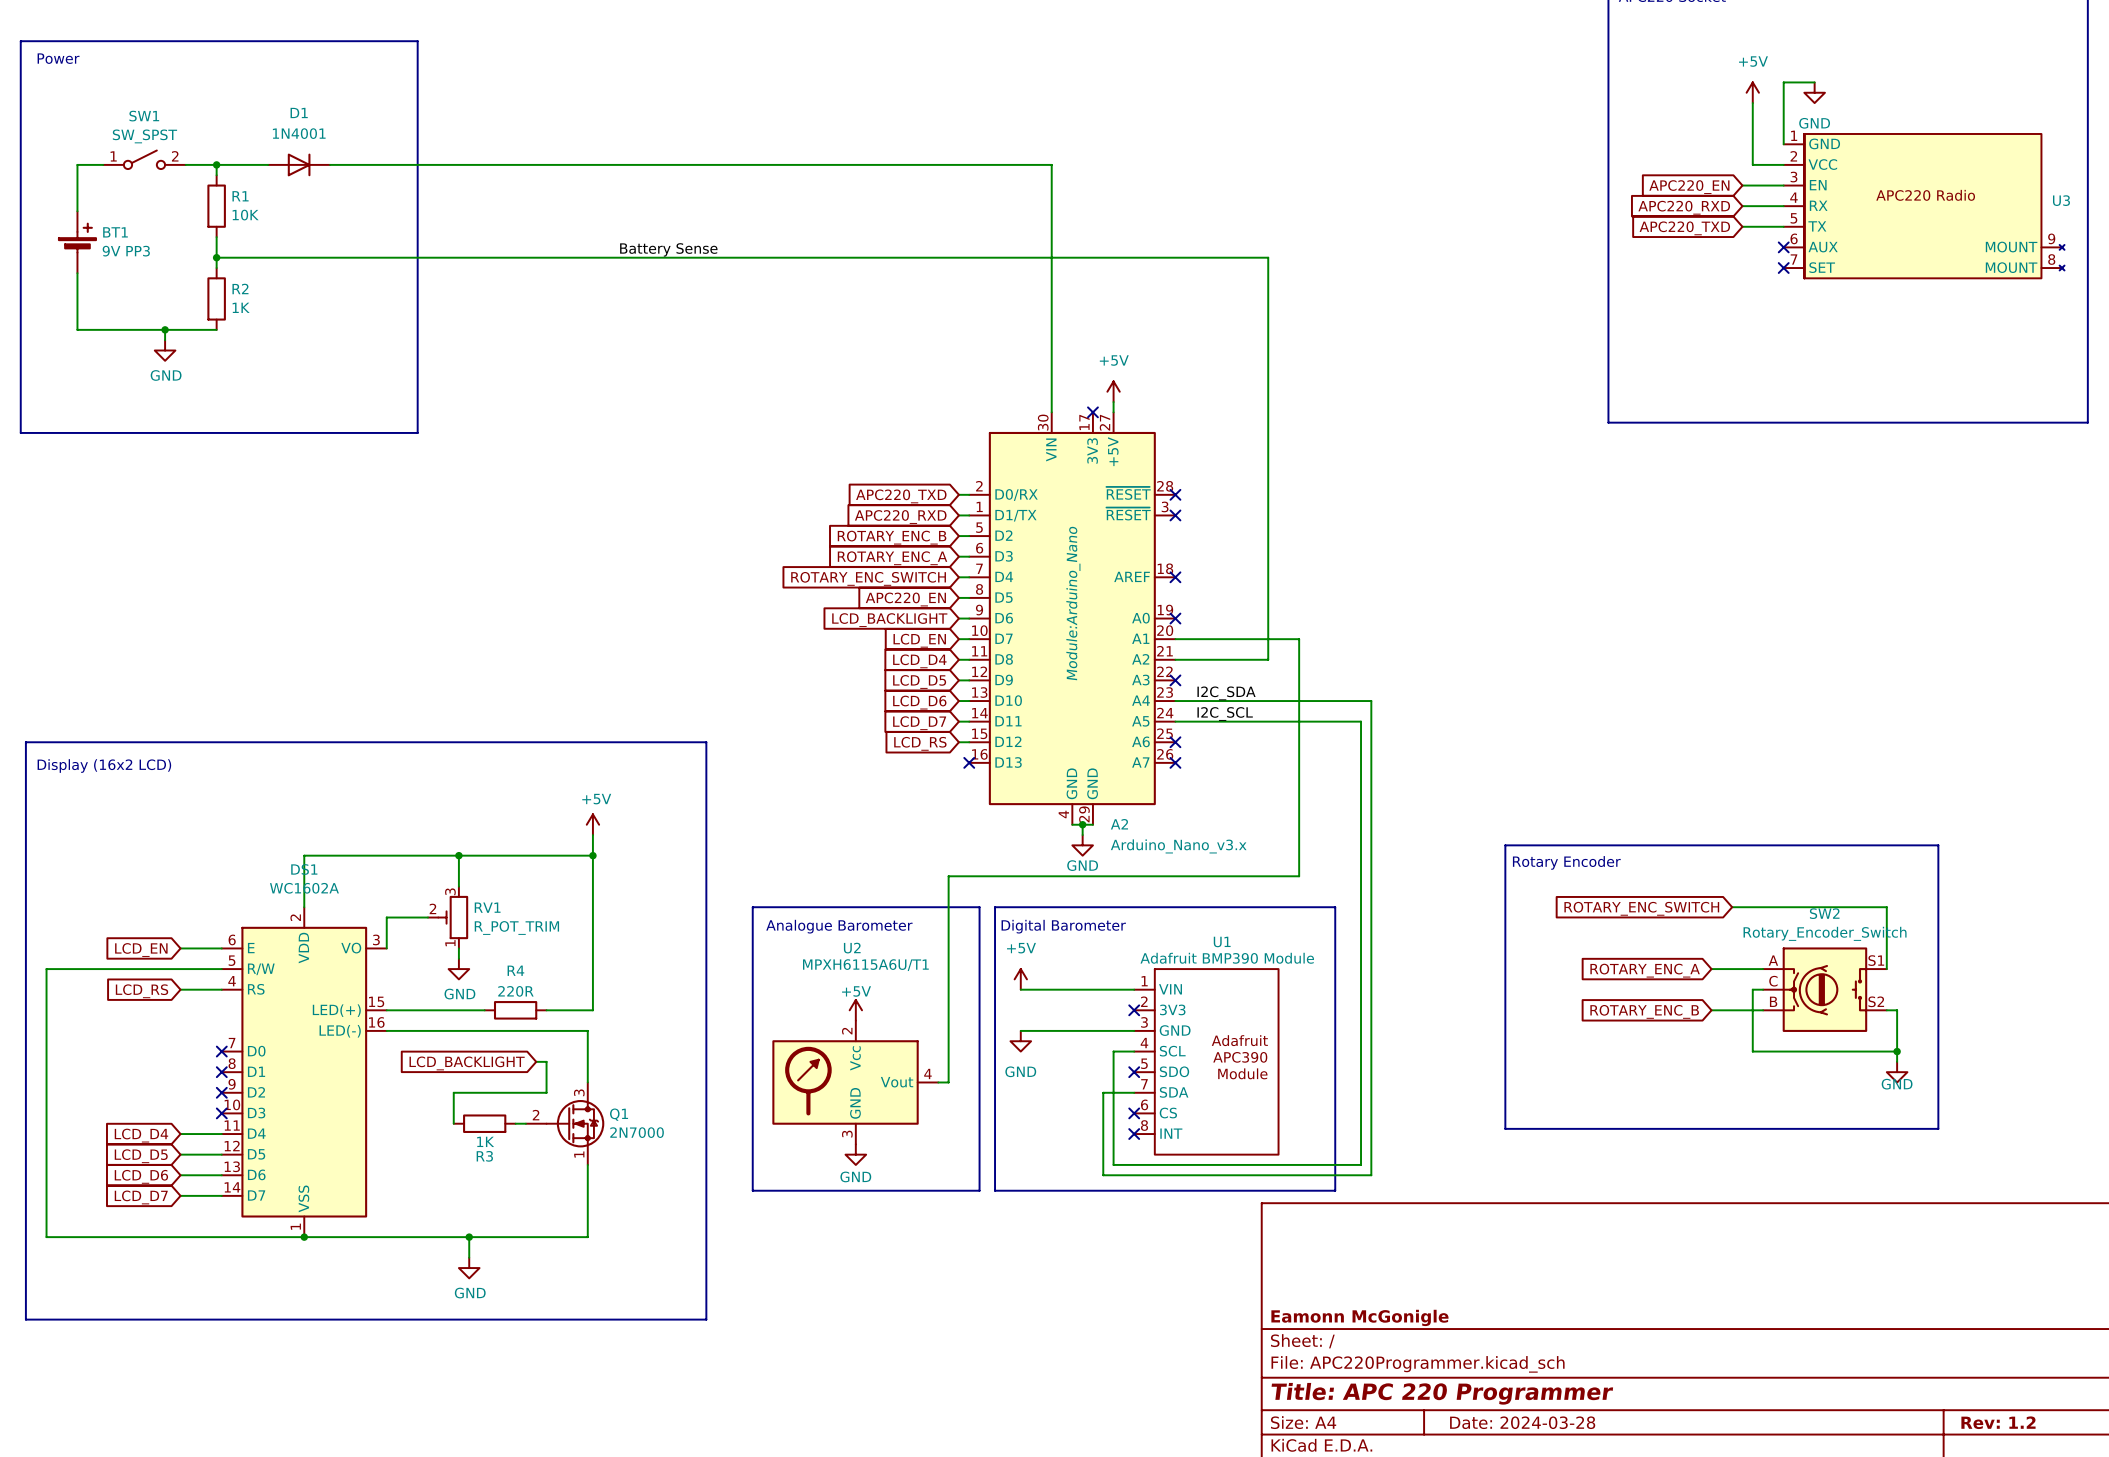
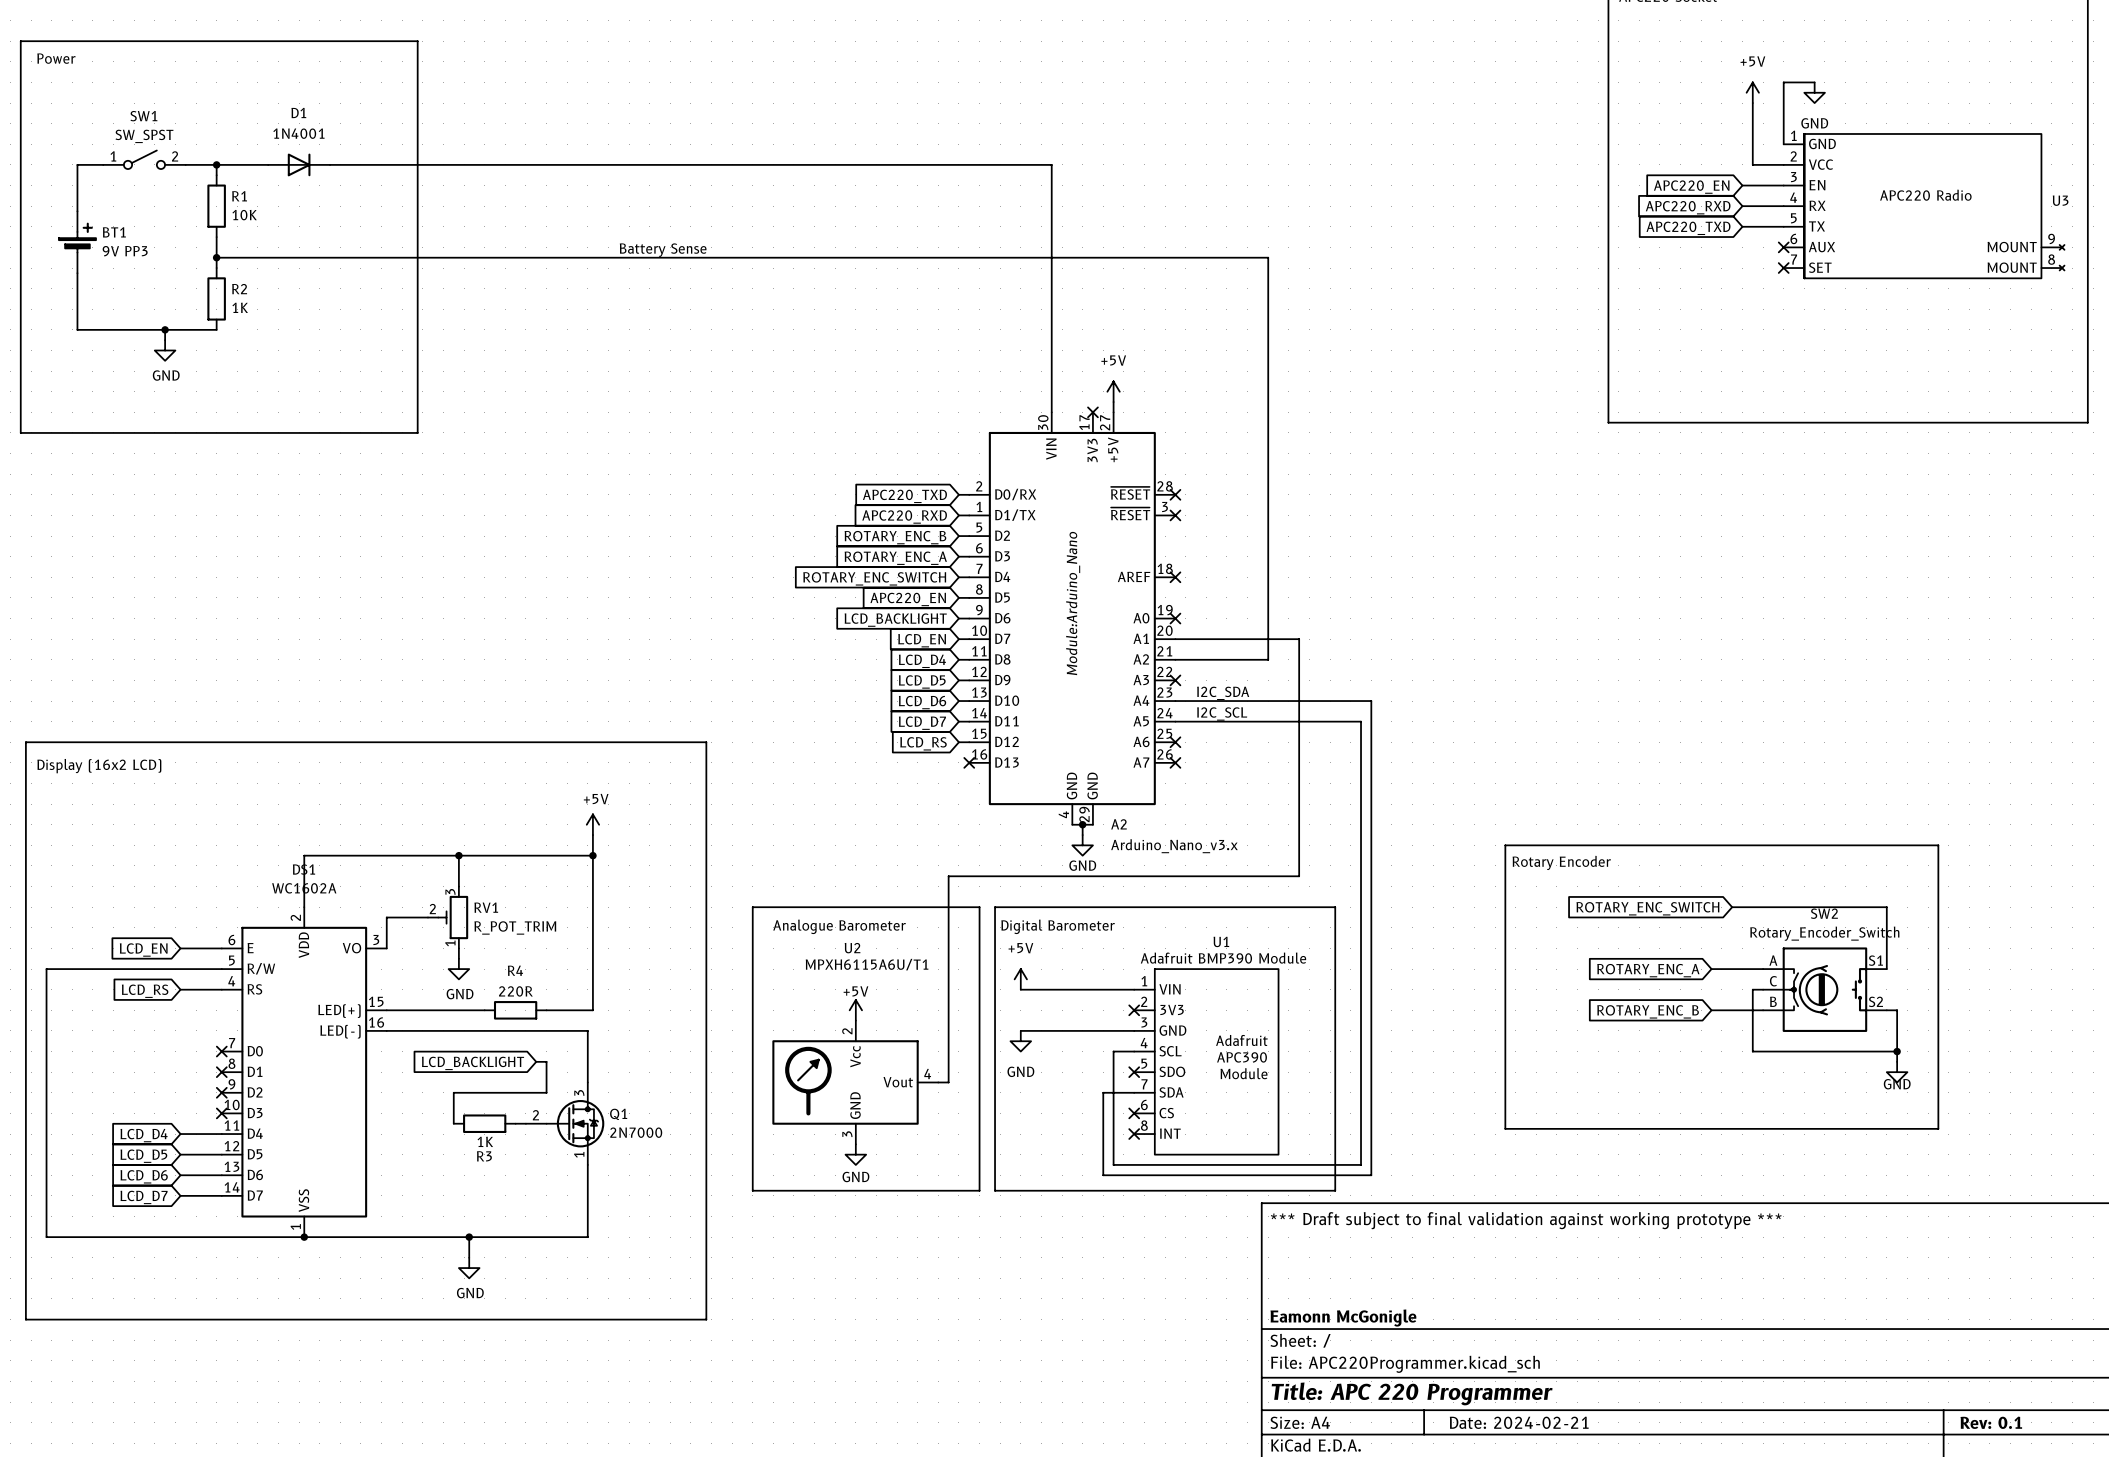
title block: none -> *** Draft subject to final validation against working prototype *** (1526, 1220)
title block: Date: 2024-03-28 (1522, 1422) -> Date: 2024-02-21 (1519, 1422)
title block: Rev: 1.2 (1998, 1422) -> Rev: 0.1 (1991, 1422)

